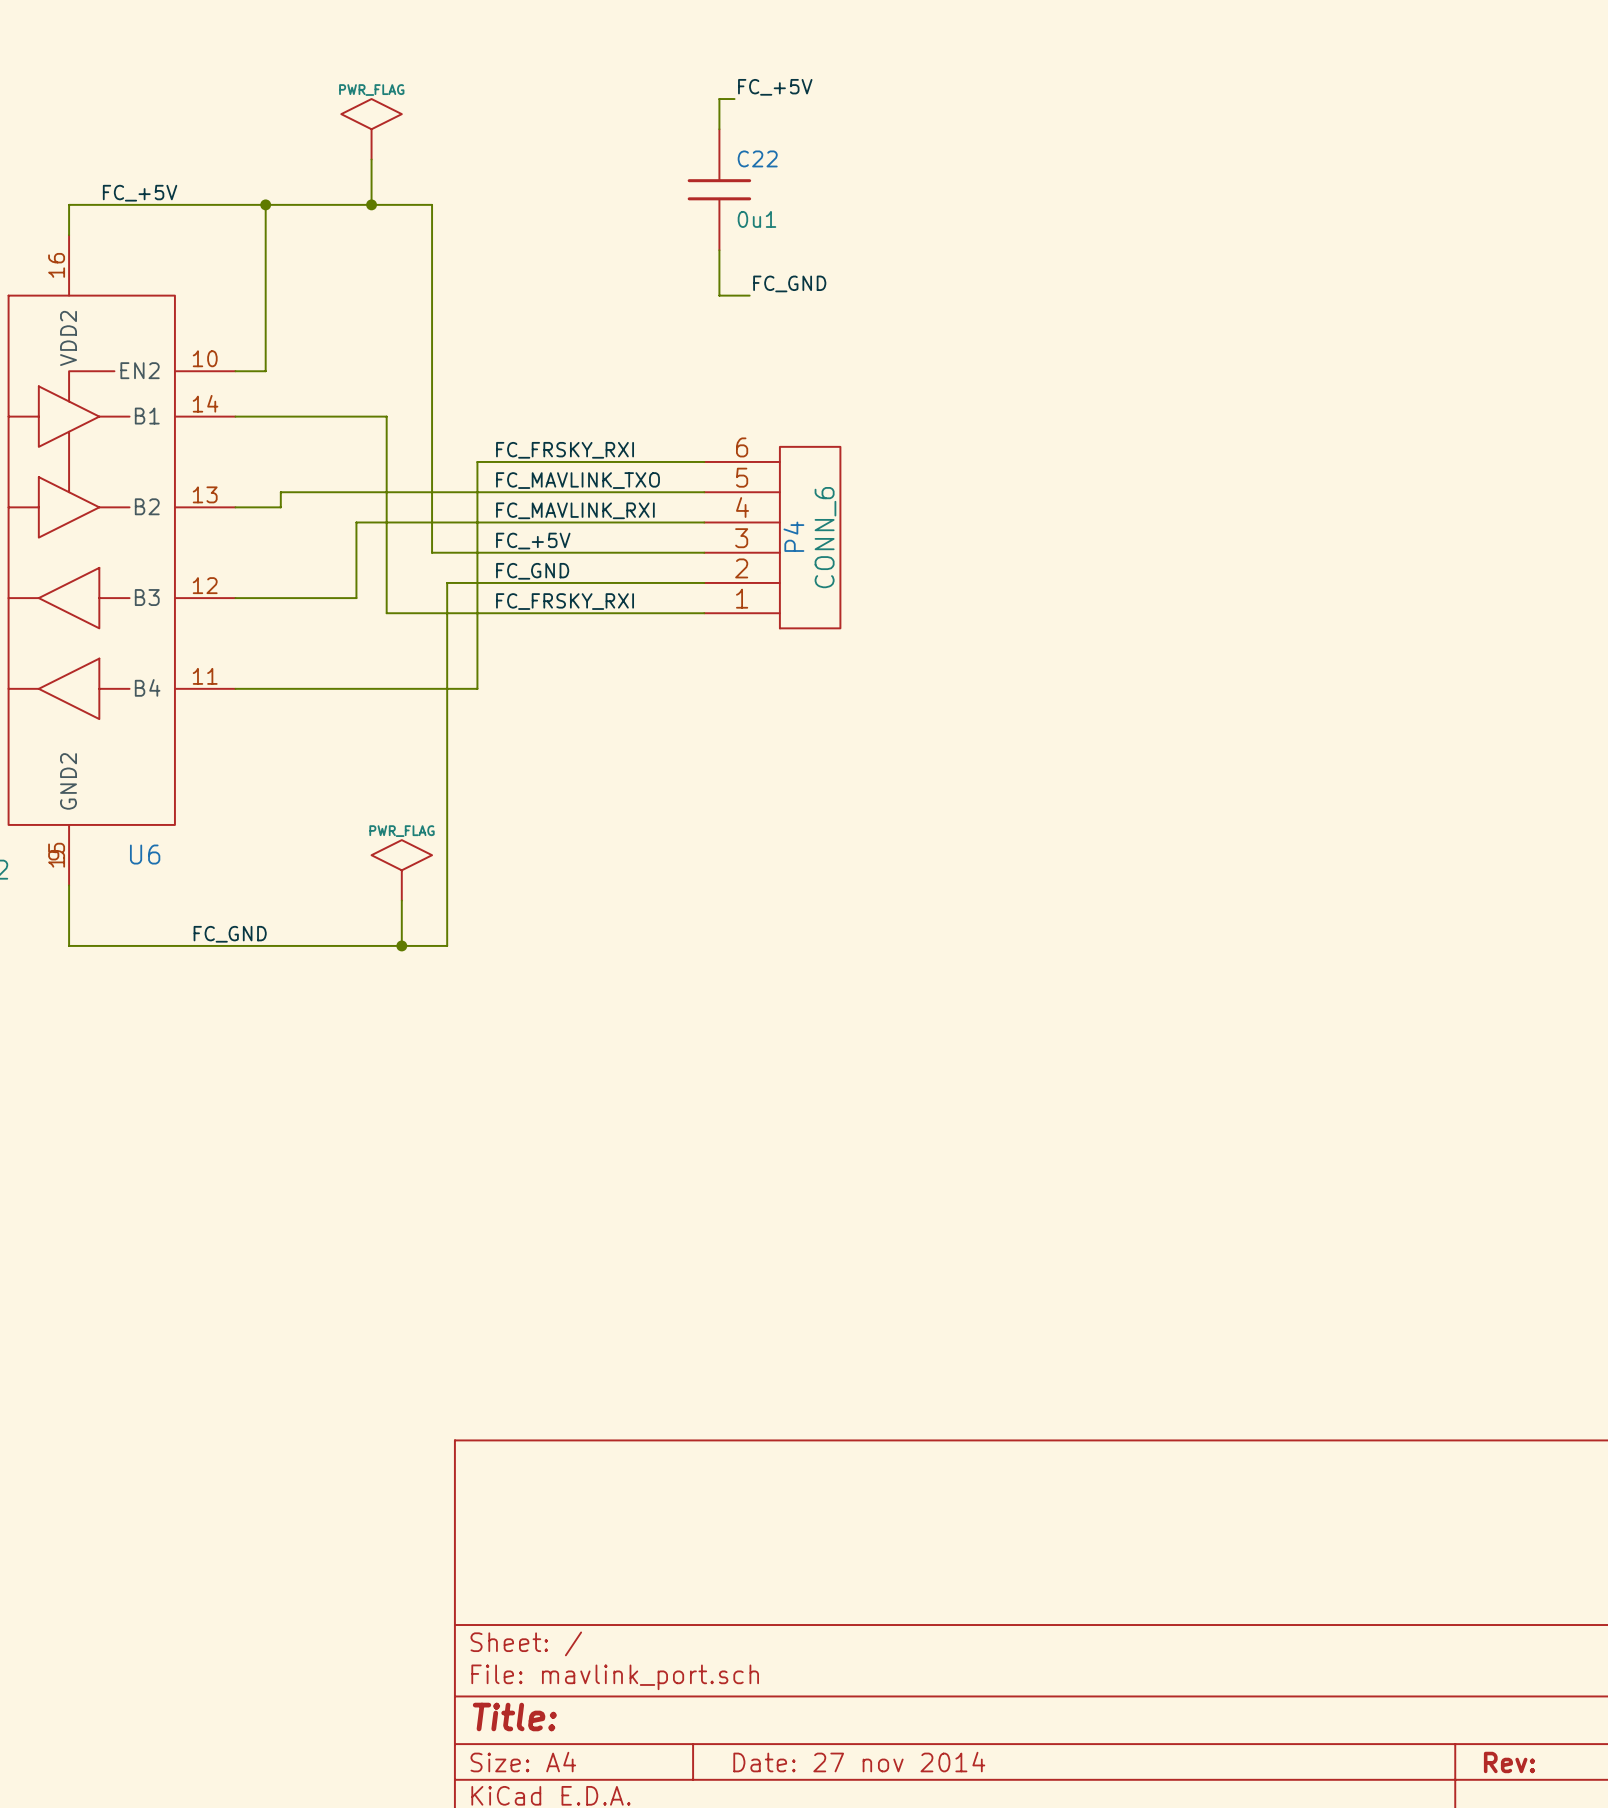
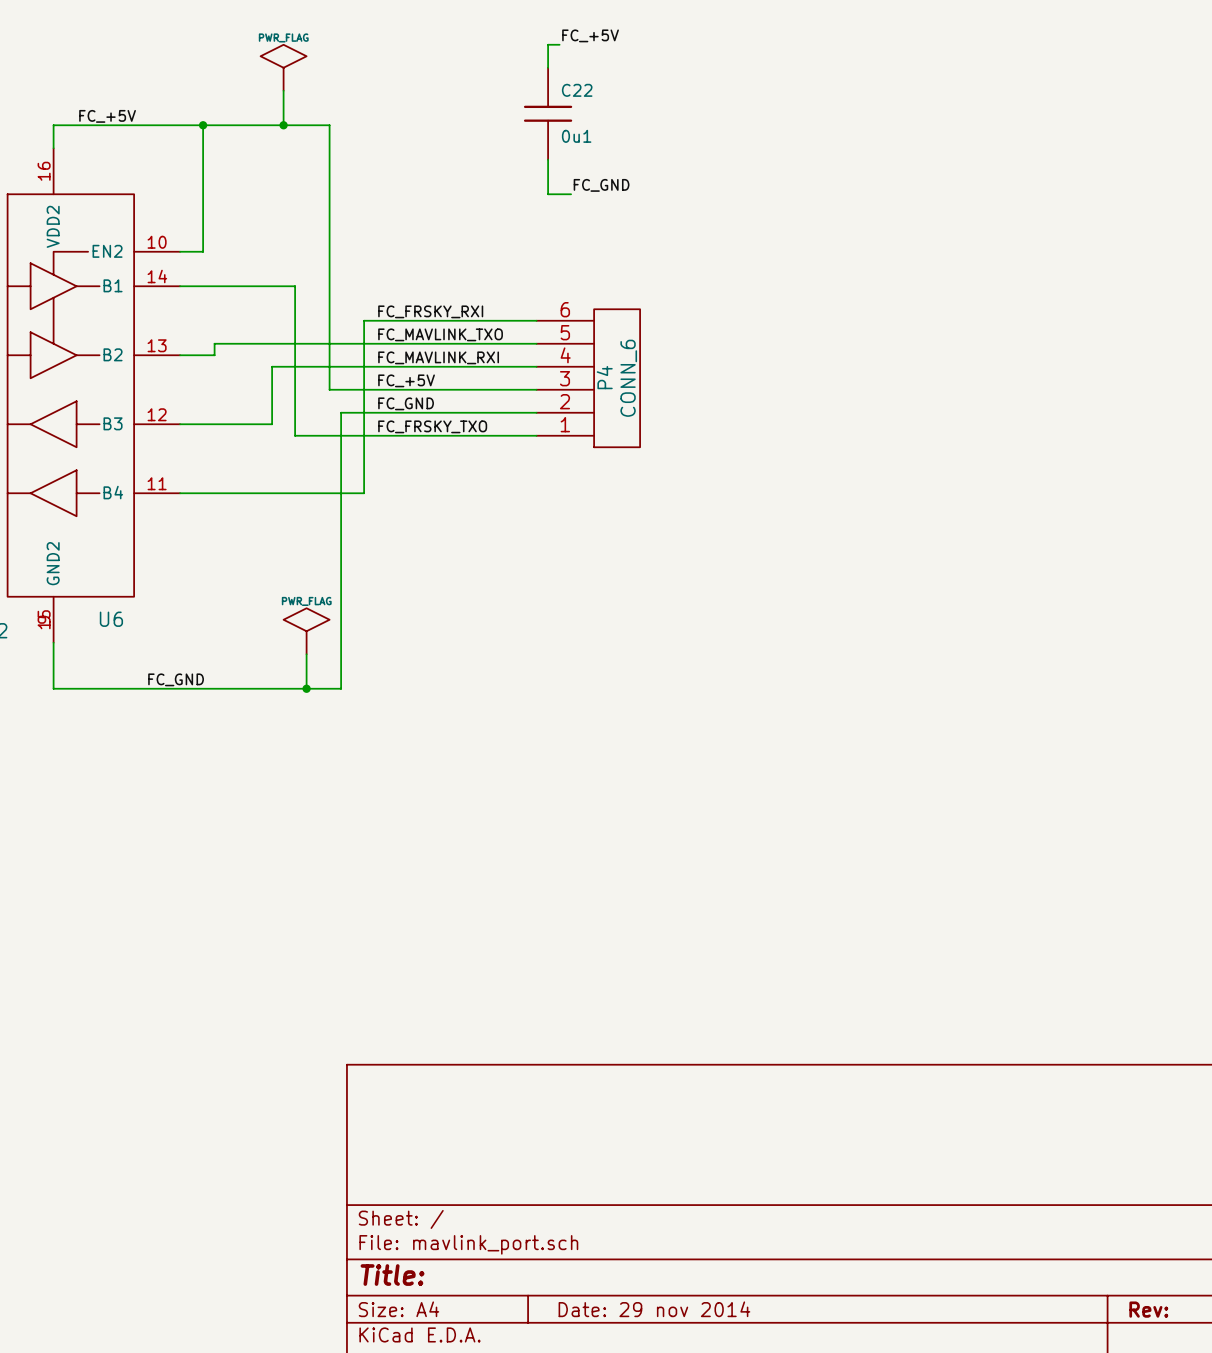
label: FC_FRSKY_RXI (565, 601) -> FC_FRSKY_TXO (432, 426)
title block: Date: 27 nov 2014 (859, 1762) -> Date: 29 nov 2014 (654, 1309)

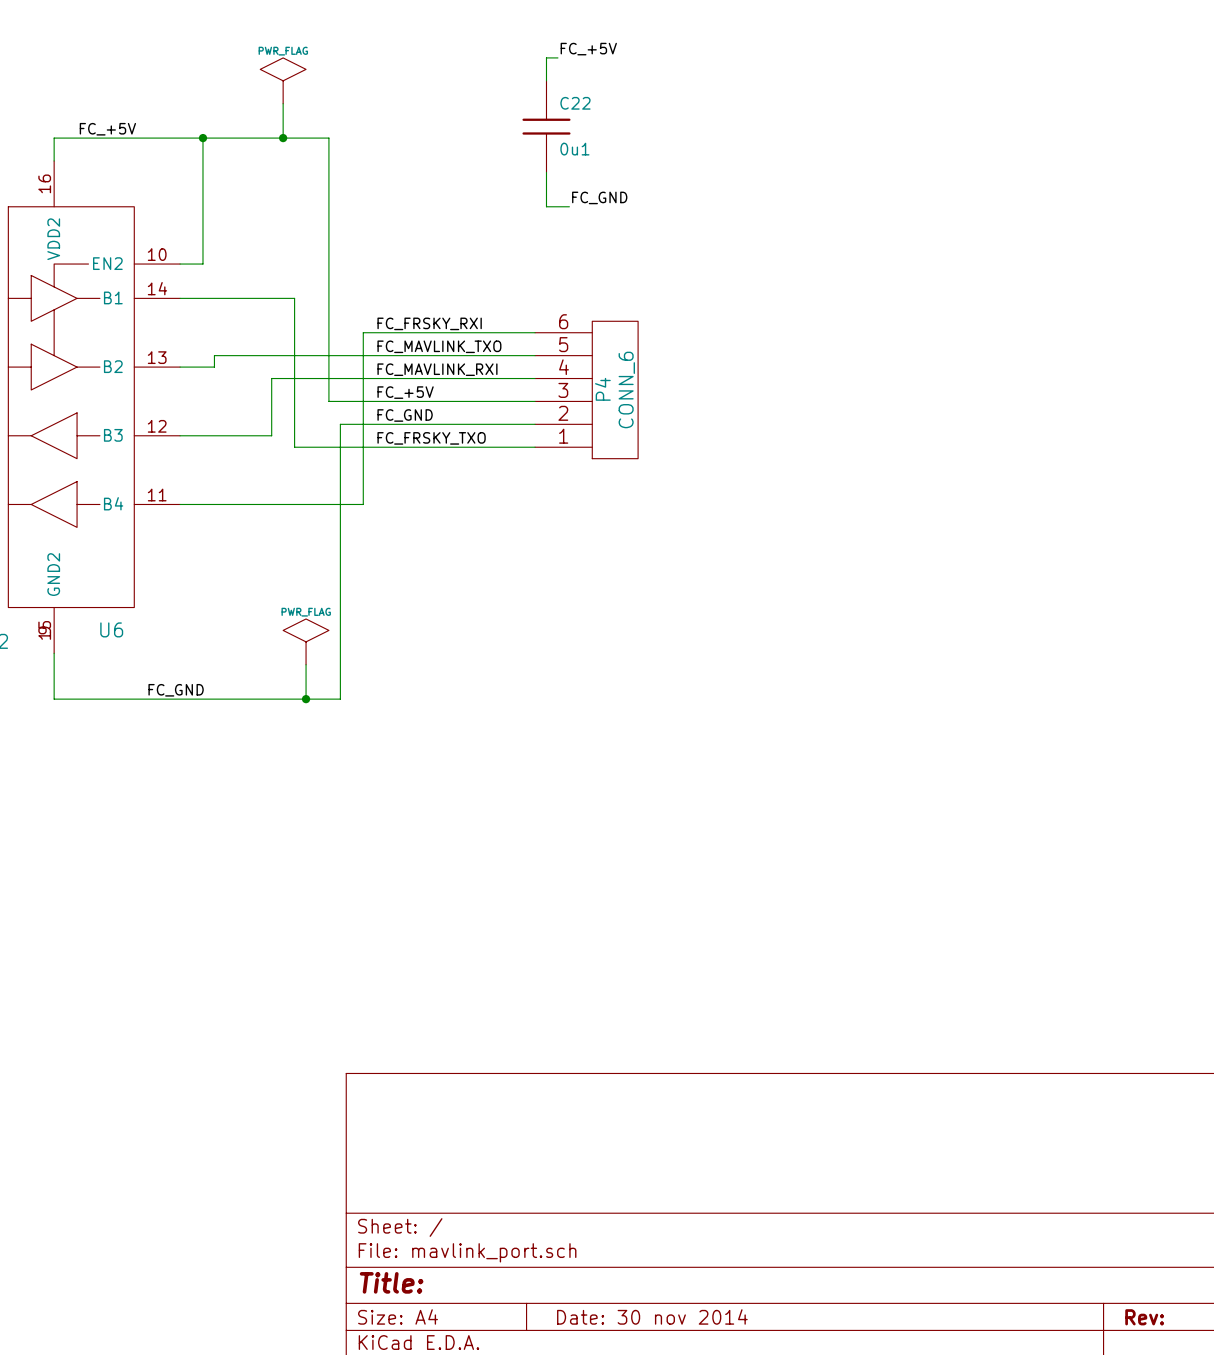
title block: Date: 29 nov 2014 (654, 1309) -> Date: 30 nov 2014 (652, 1316)

